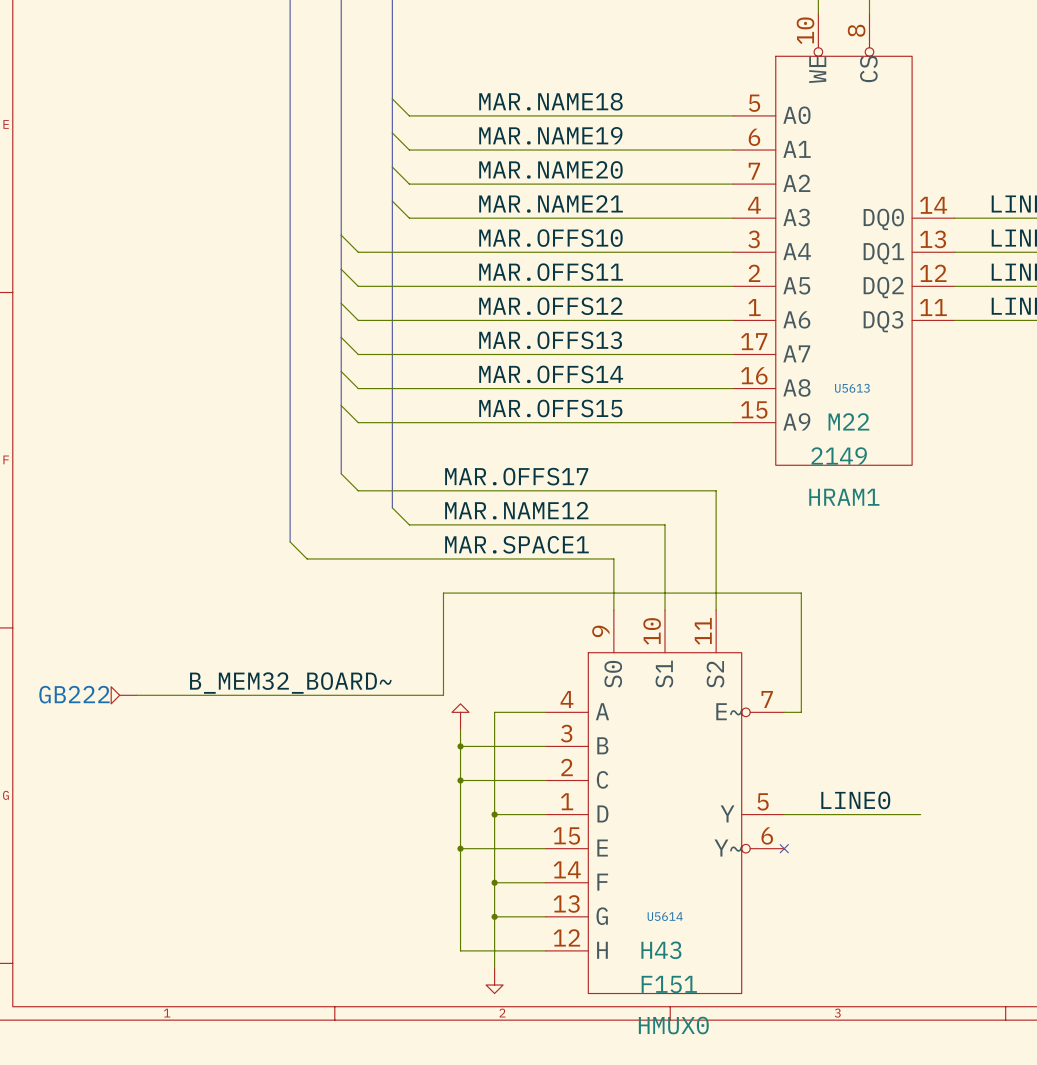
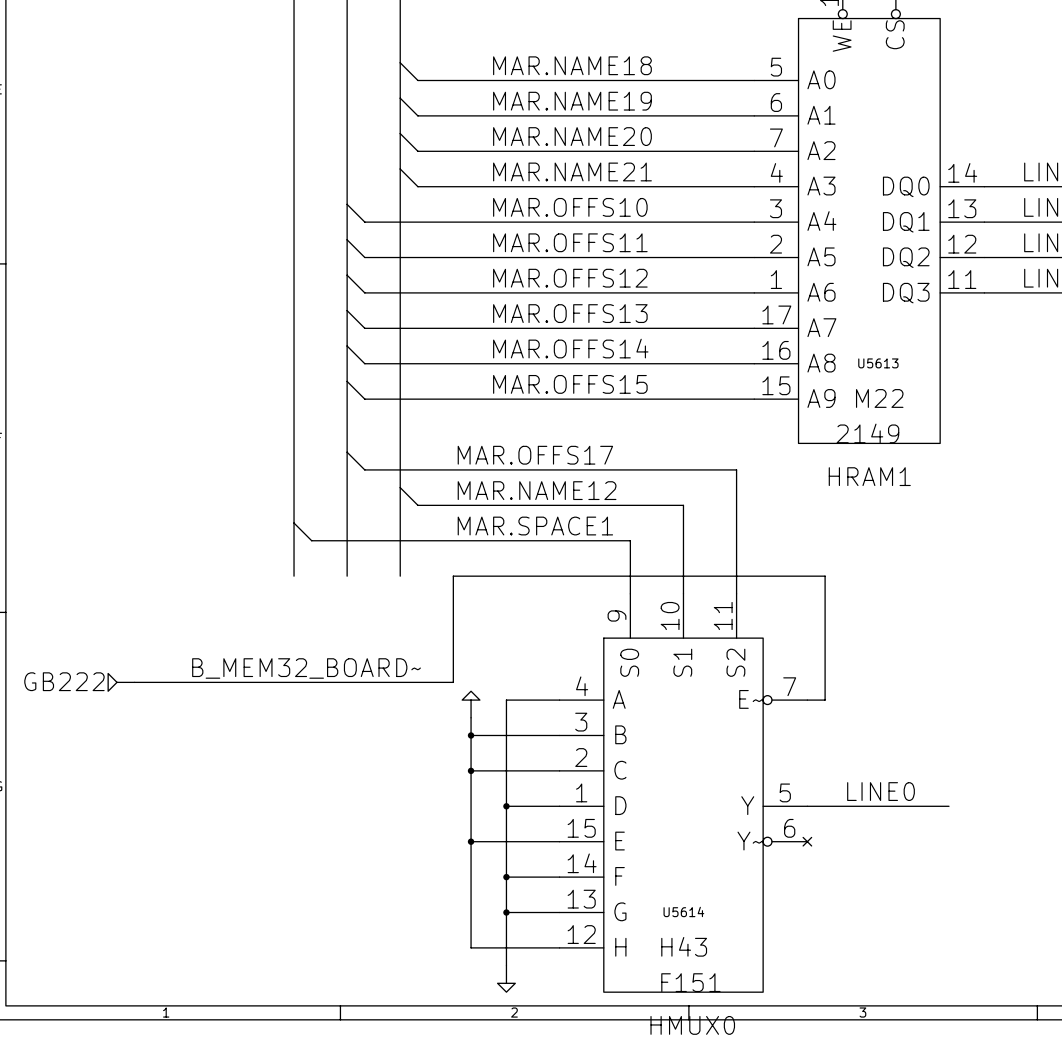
bus: none -> (347, 452) (347, 576)
bus: none -> (400, 487) (400, 576)
bus: none -> (294, 523) (294, 576)

